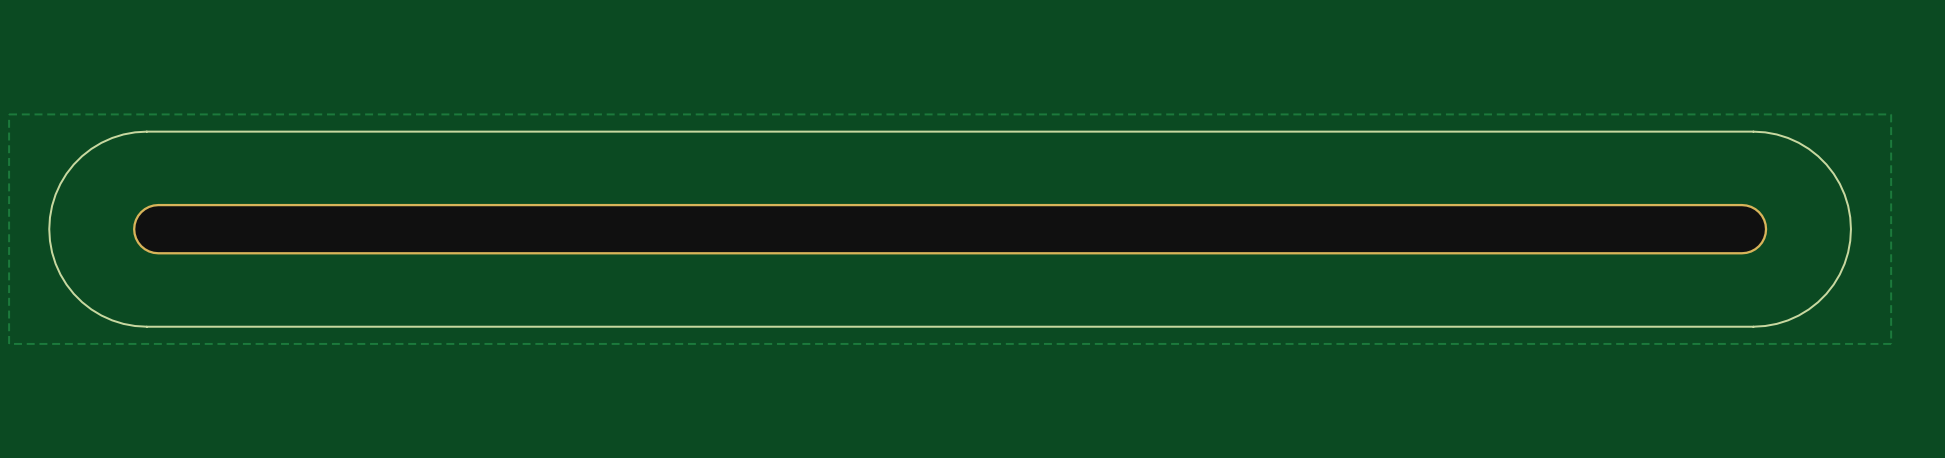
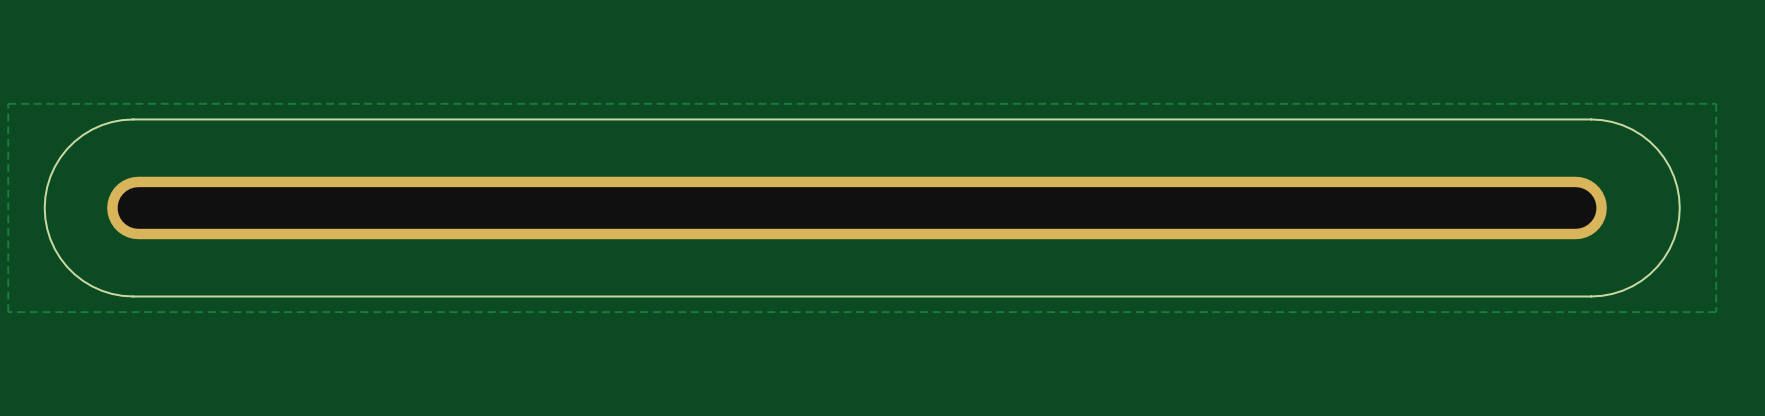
part footprint: [133, 203, 1768, 255] -> [107, 176, 1607, 240]

